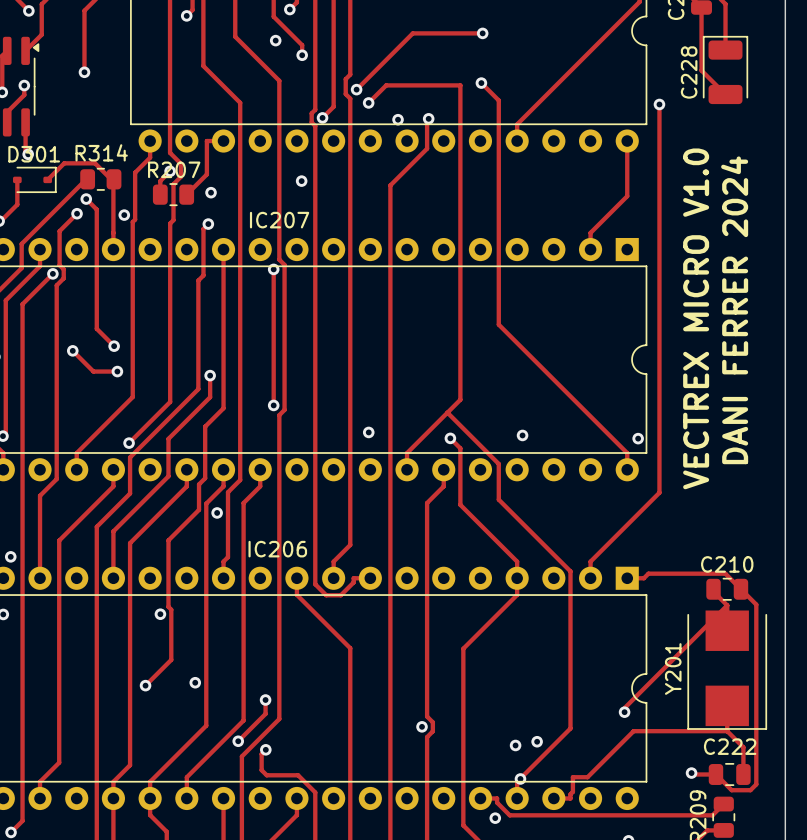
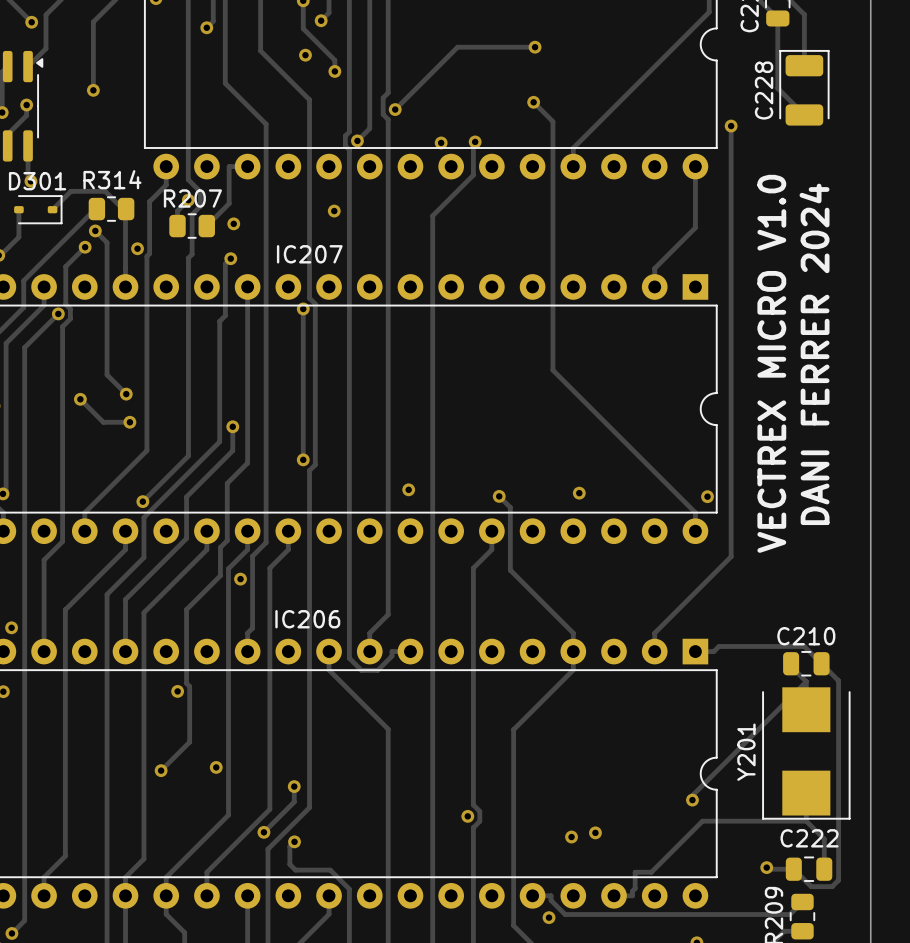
track: (368, 102) (386, 85) (460, 85) (460, 399) (447, 412) -> none
via: (368, 102) -> none
track: (447, 412) (407, 453) (407, 469) -> none
track: (447, 412) (498, 463) (498, 499) (570, 571) (570, 728) (517, 781) (517, 798) -> none
via: (520, 778) -> none

